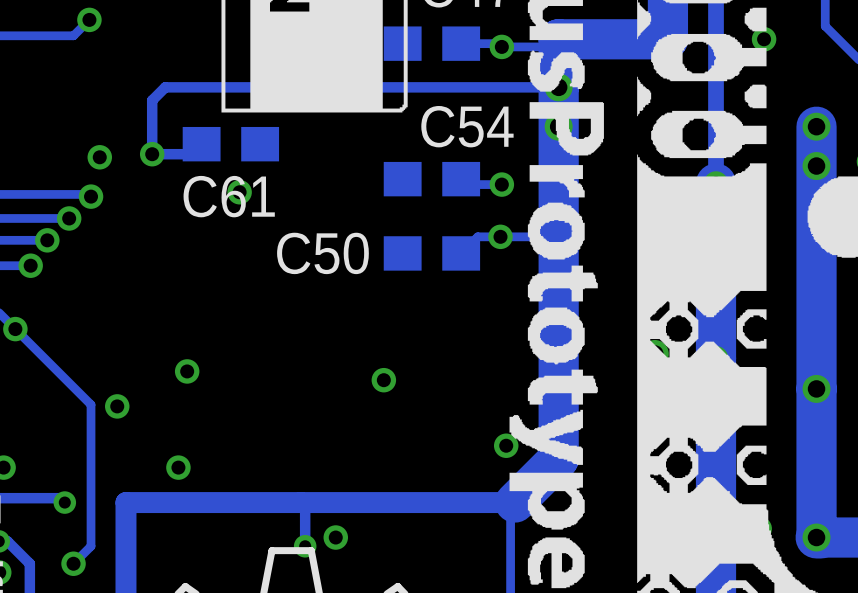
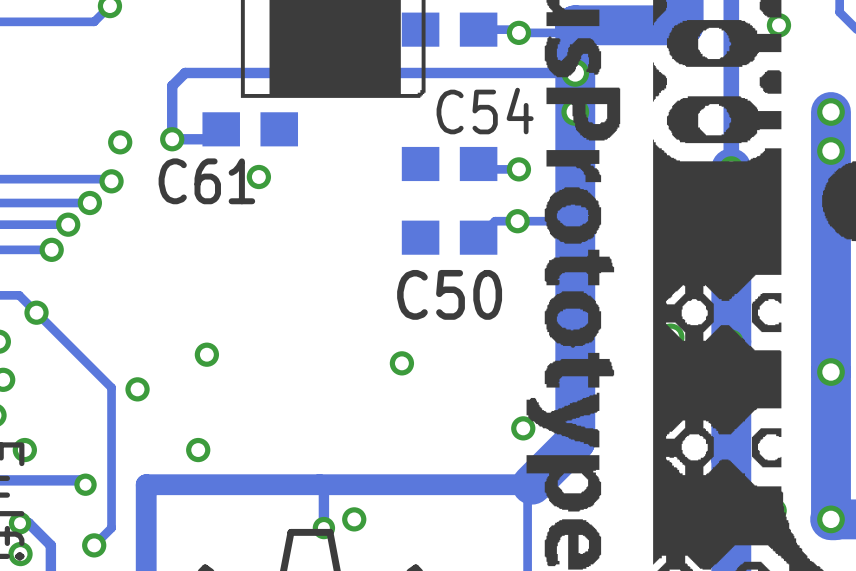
C61 name position: C61 (229, 196) -> C61 (206, 181)
C50 name position: C50 (322, 253) -> C50 (449, 294)

